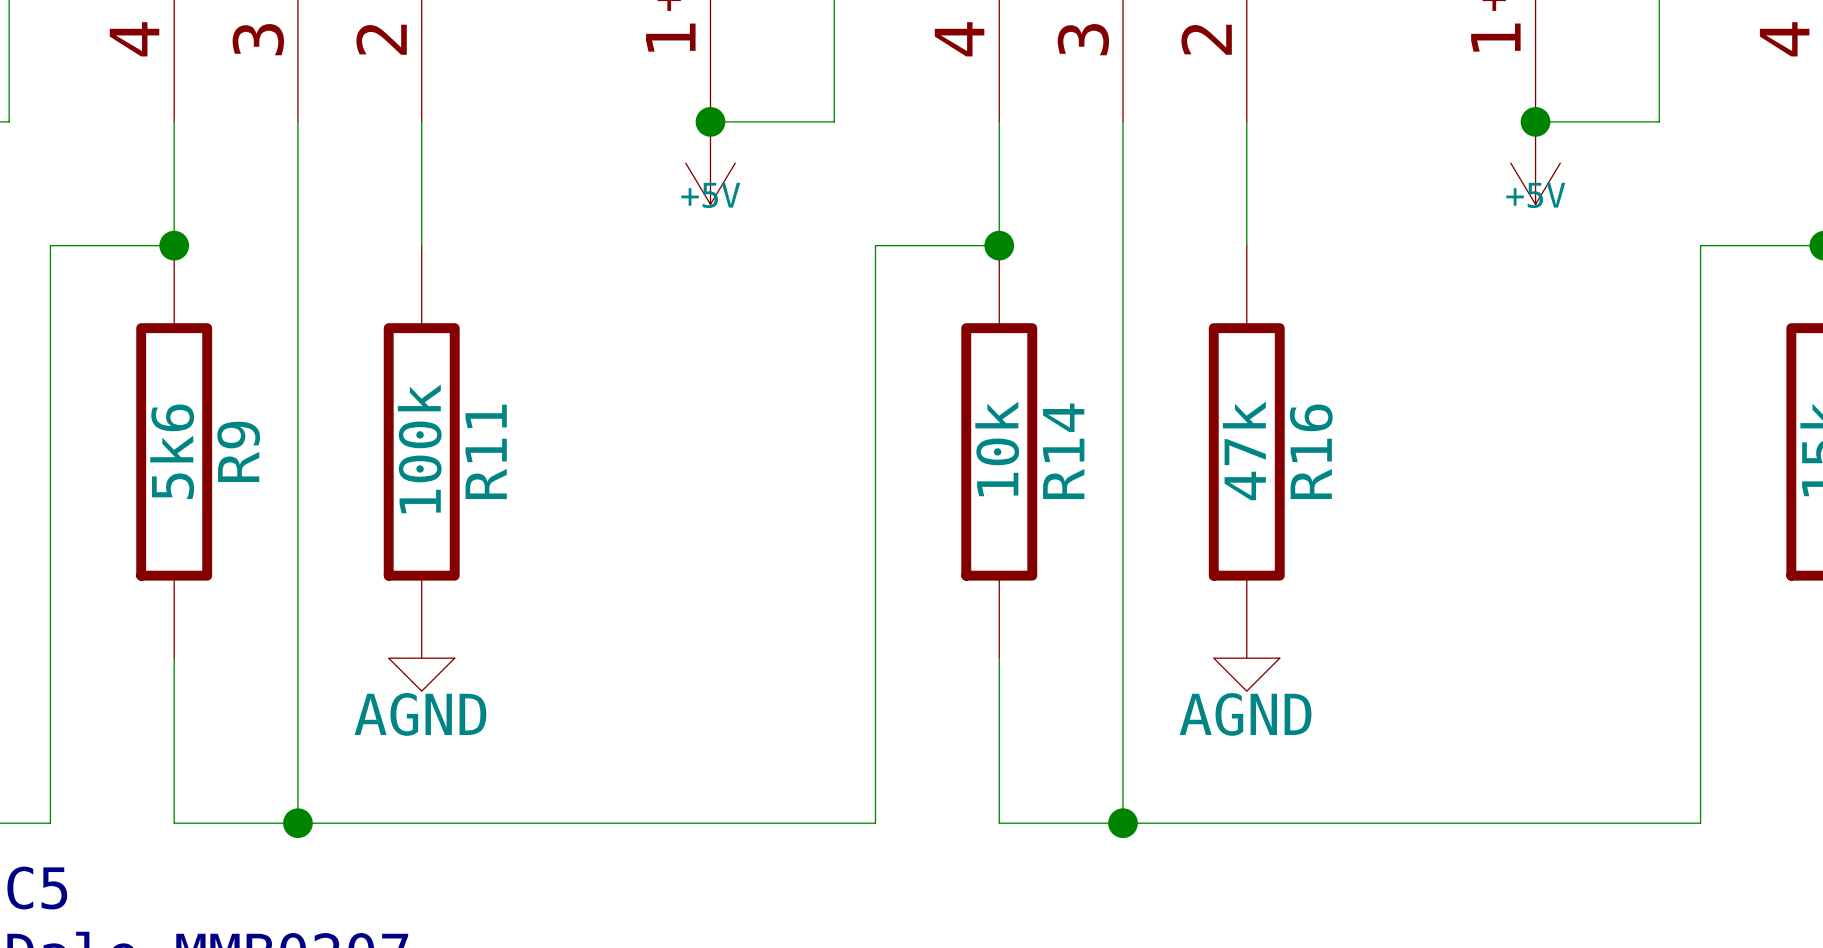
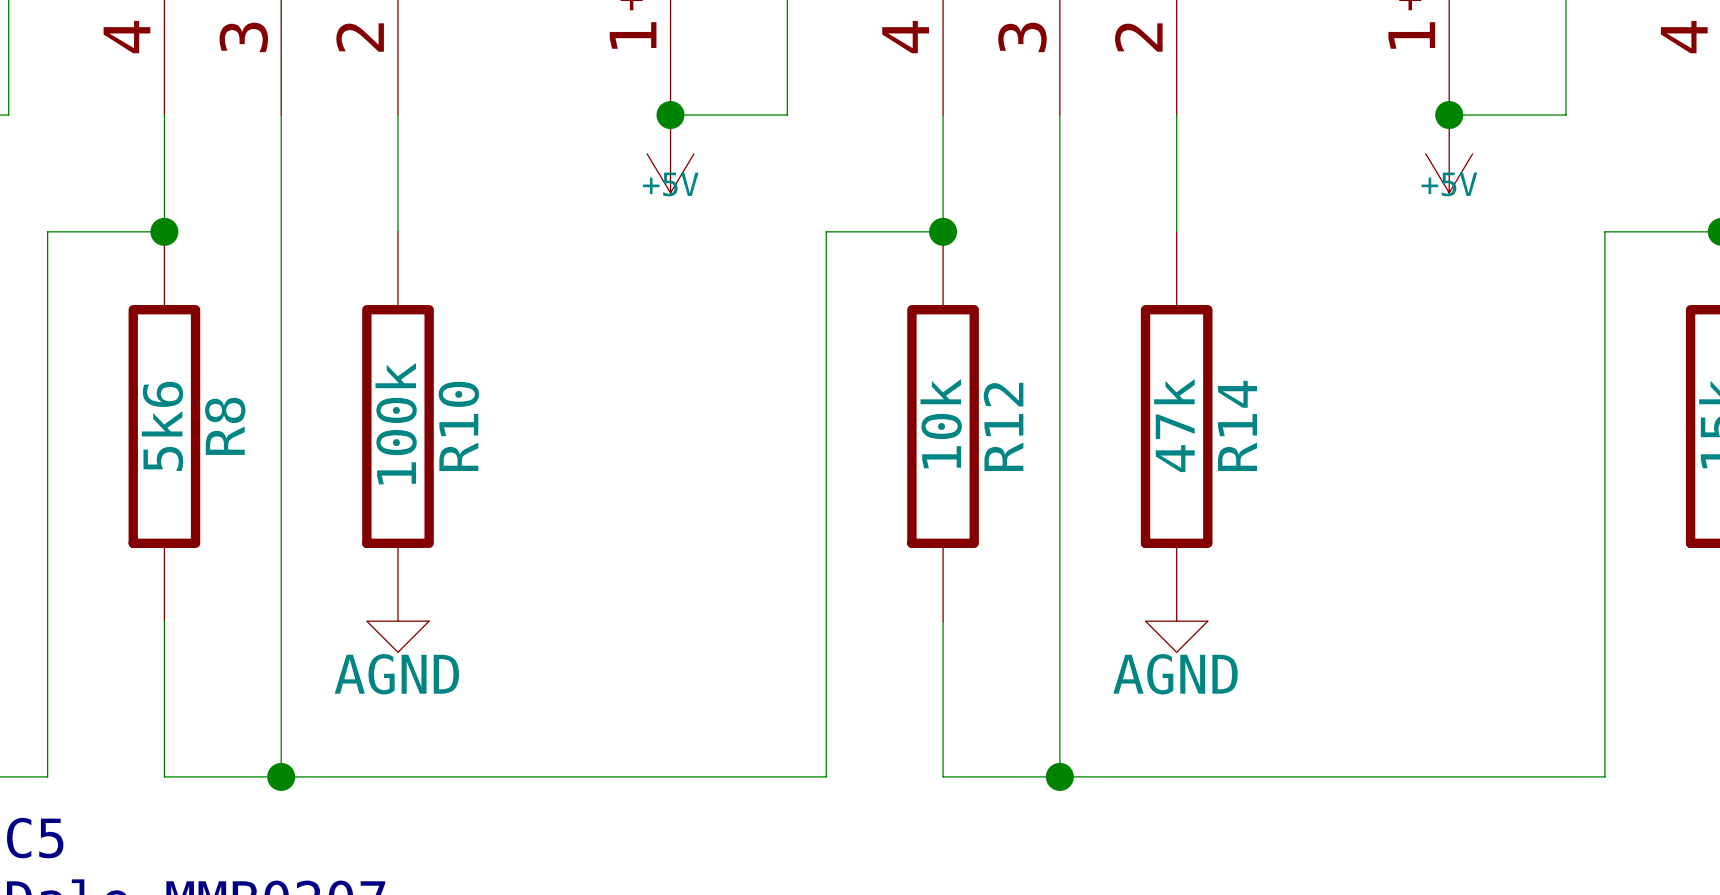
R9 name: R9 (238, 451) -> R8 (225, 426)
R11 name: R11 (486, 451) -> R10 (458, 426)
R14 name: R14 (1063, 451) -> R12 (1003, 426)
R16 name: R16 (1311, 451) -> R14 (1237, 425)

